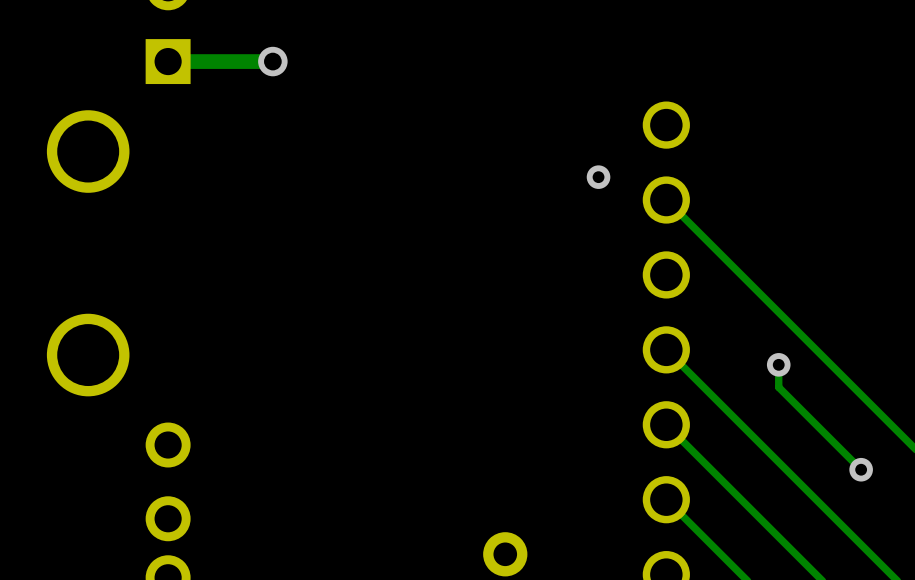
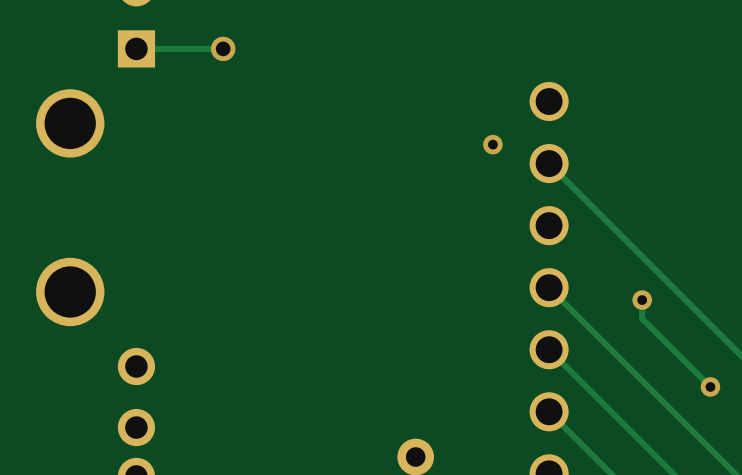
track width: thick (272, 61) (168, 61) -> thin (223, 48) (136, 48)

